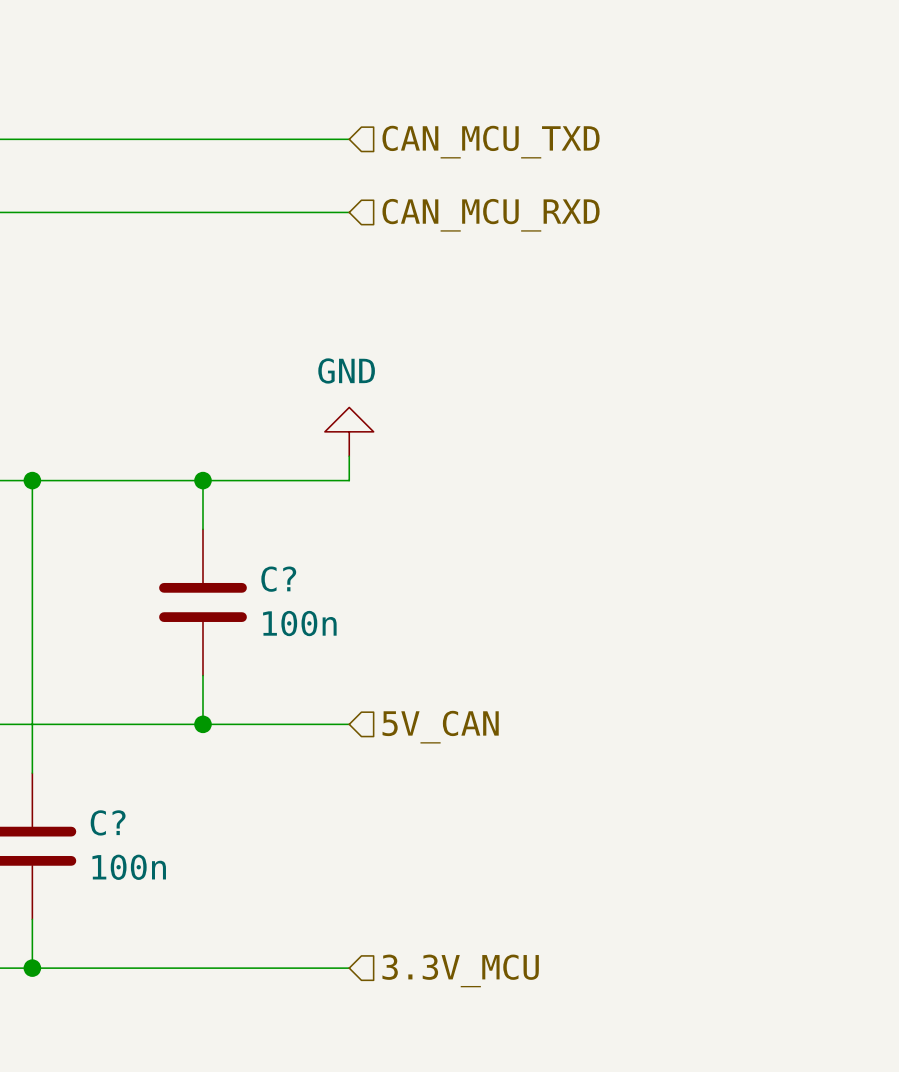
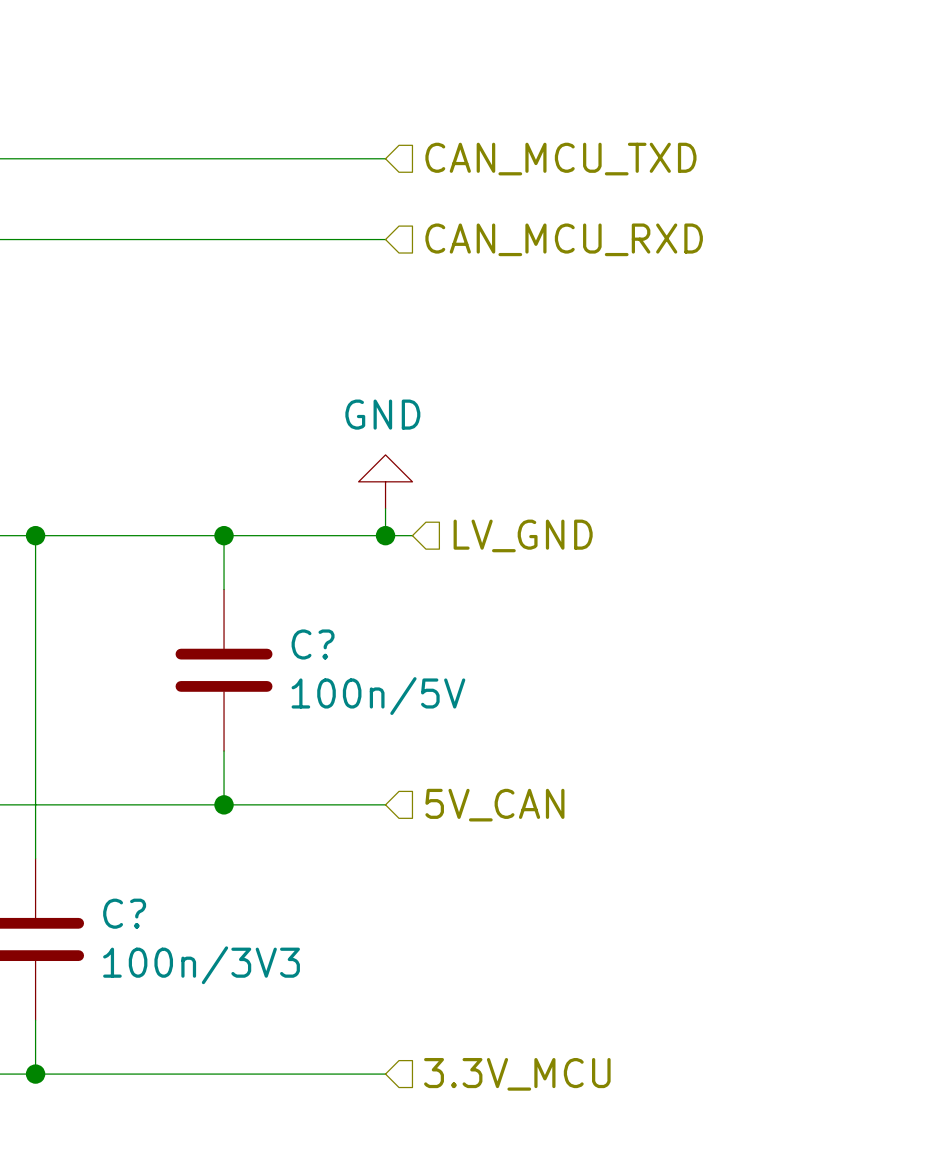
wire: none -> (385, 535) (412, 535)
junction: none -> (385, 535)
hierarchical label: none -> LV_GND (523, 535)
C? value: 100n (299, 623) -> 100n/5V (378, 696)
C? value: 100n (129, 867) -> 100n/3V3 (201, 965)

